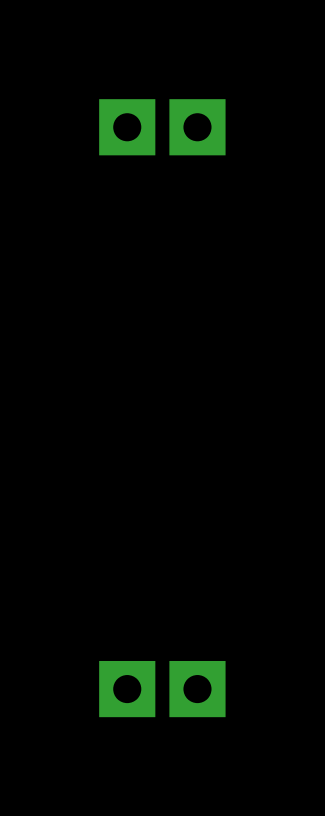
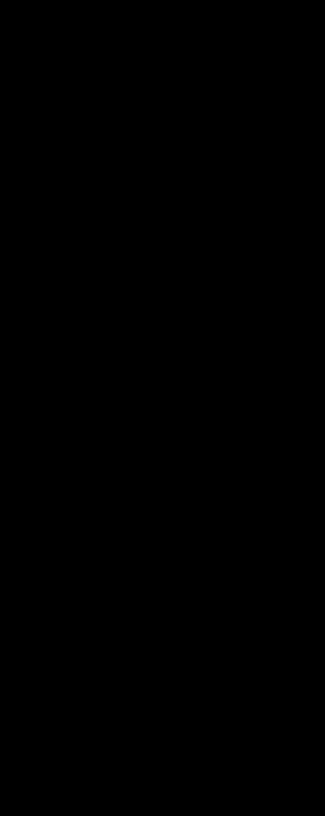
part: (162, 127) -> none
part: (162, 689) -> none

